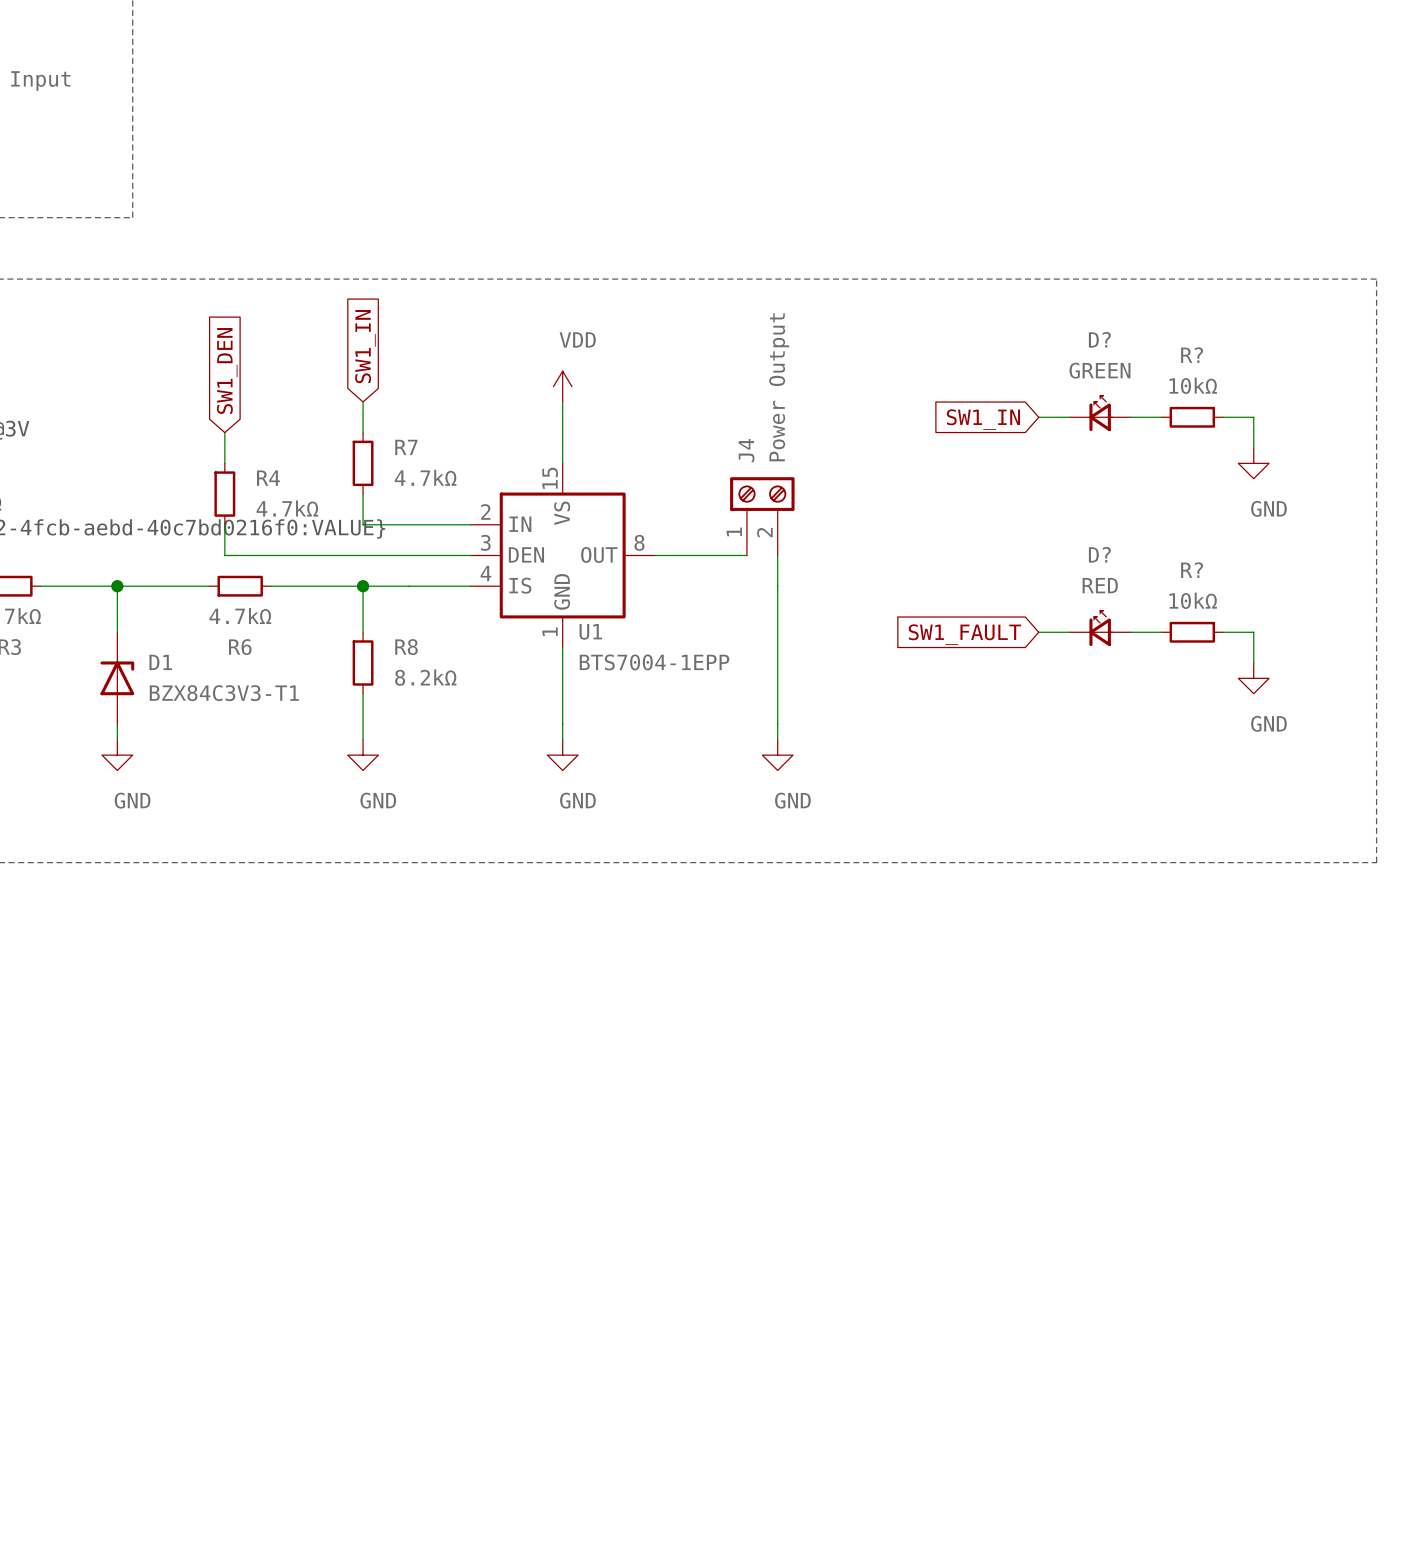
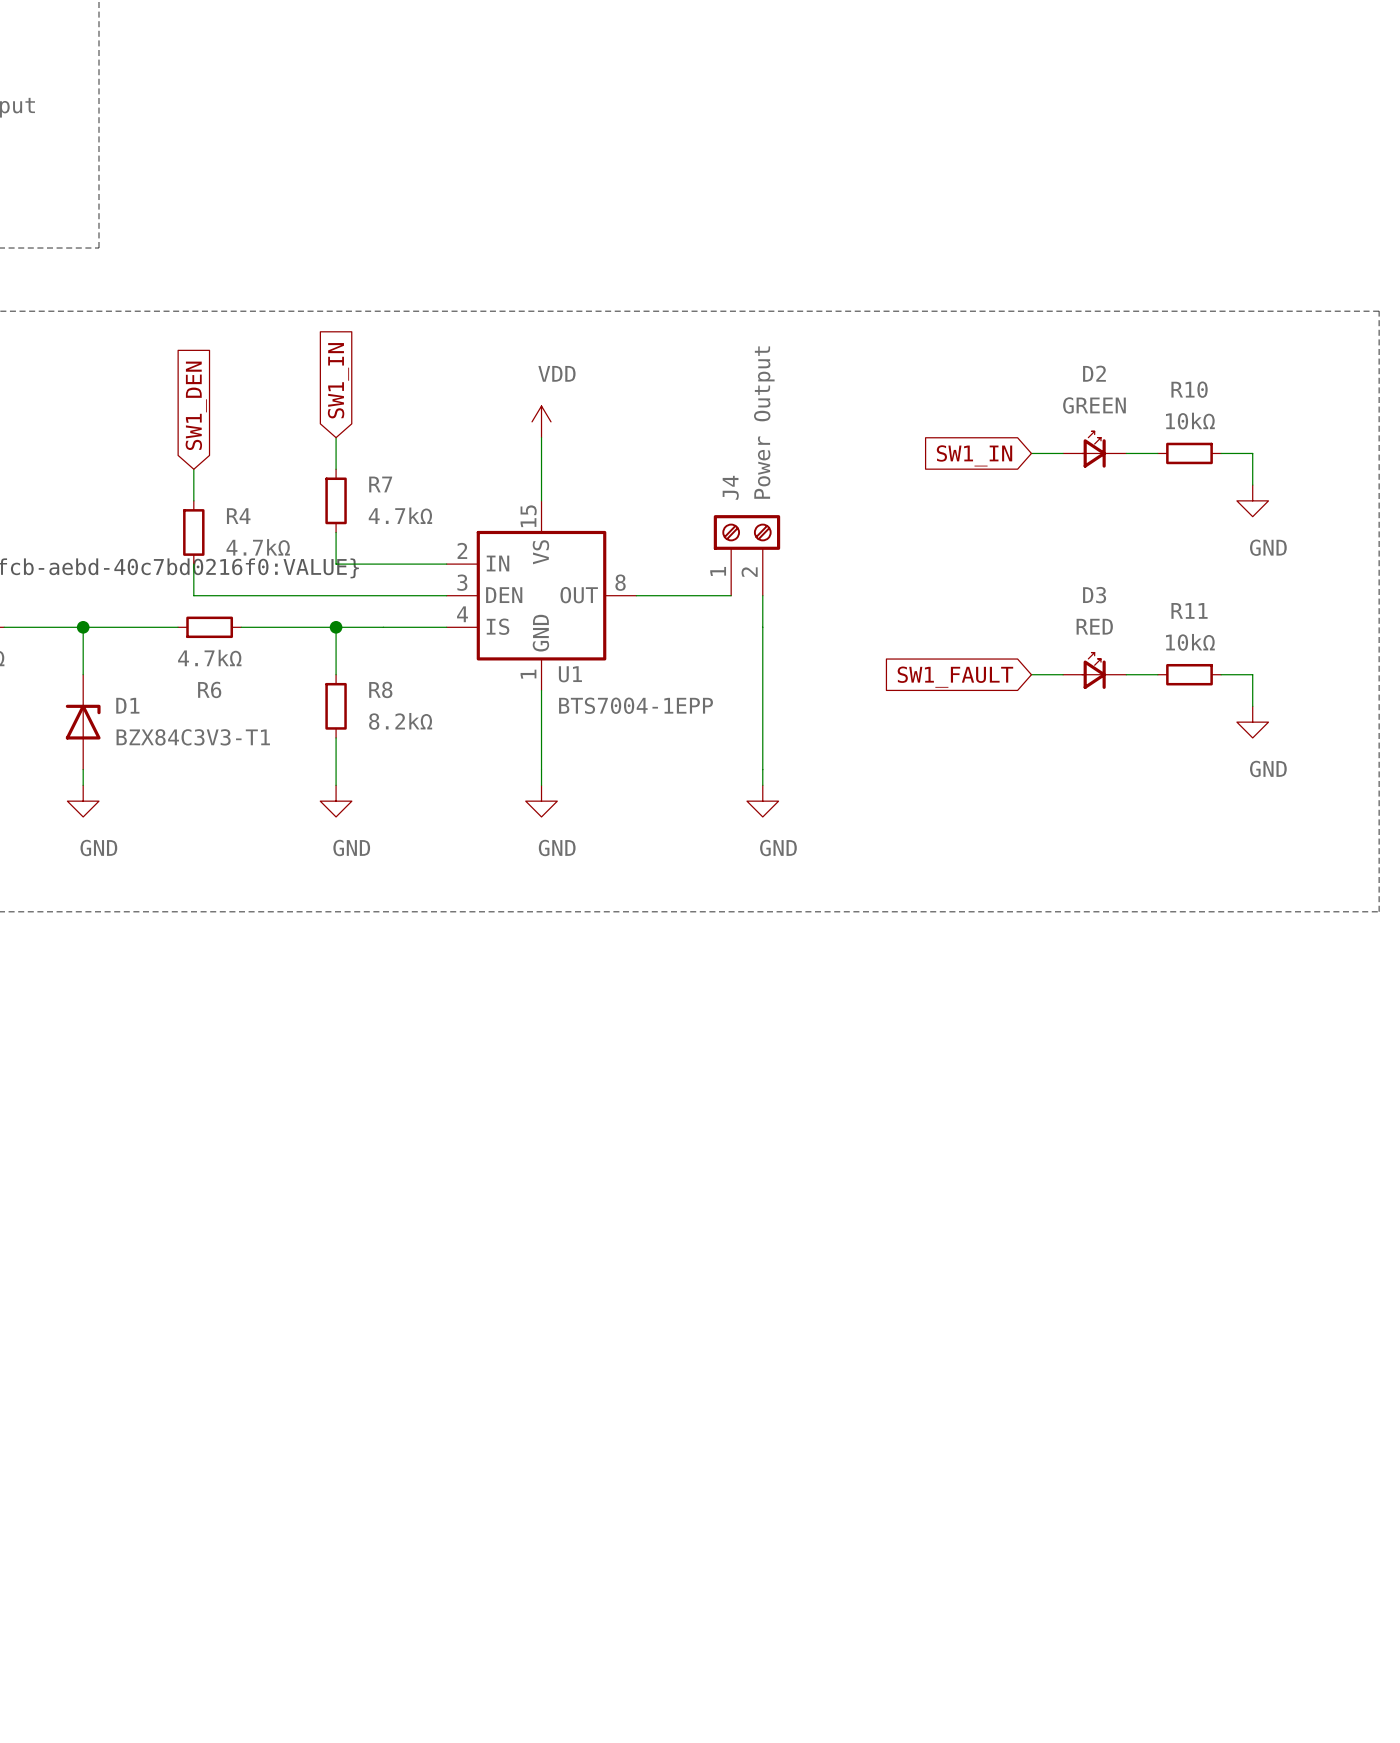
R? name: R? (1192, 355) -> R10 (1189, 389)
D?: GREEN (1100, 413) -> none
D2: none -> GREEN (1094, 449)
R? name: R? (1192, 570) -> R11 (1189, 610)
D?: RED (1100, 628) -> none
D3: none -> RED (1094, 670)

